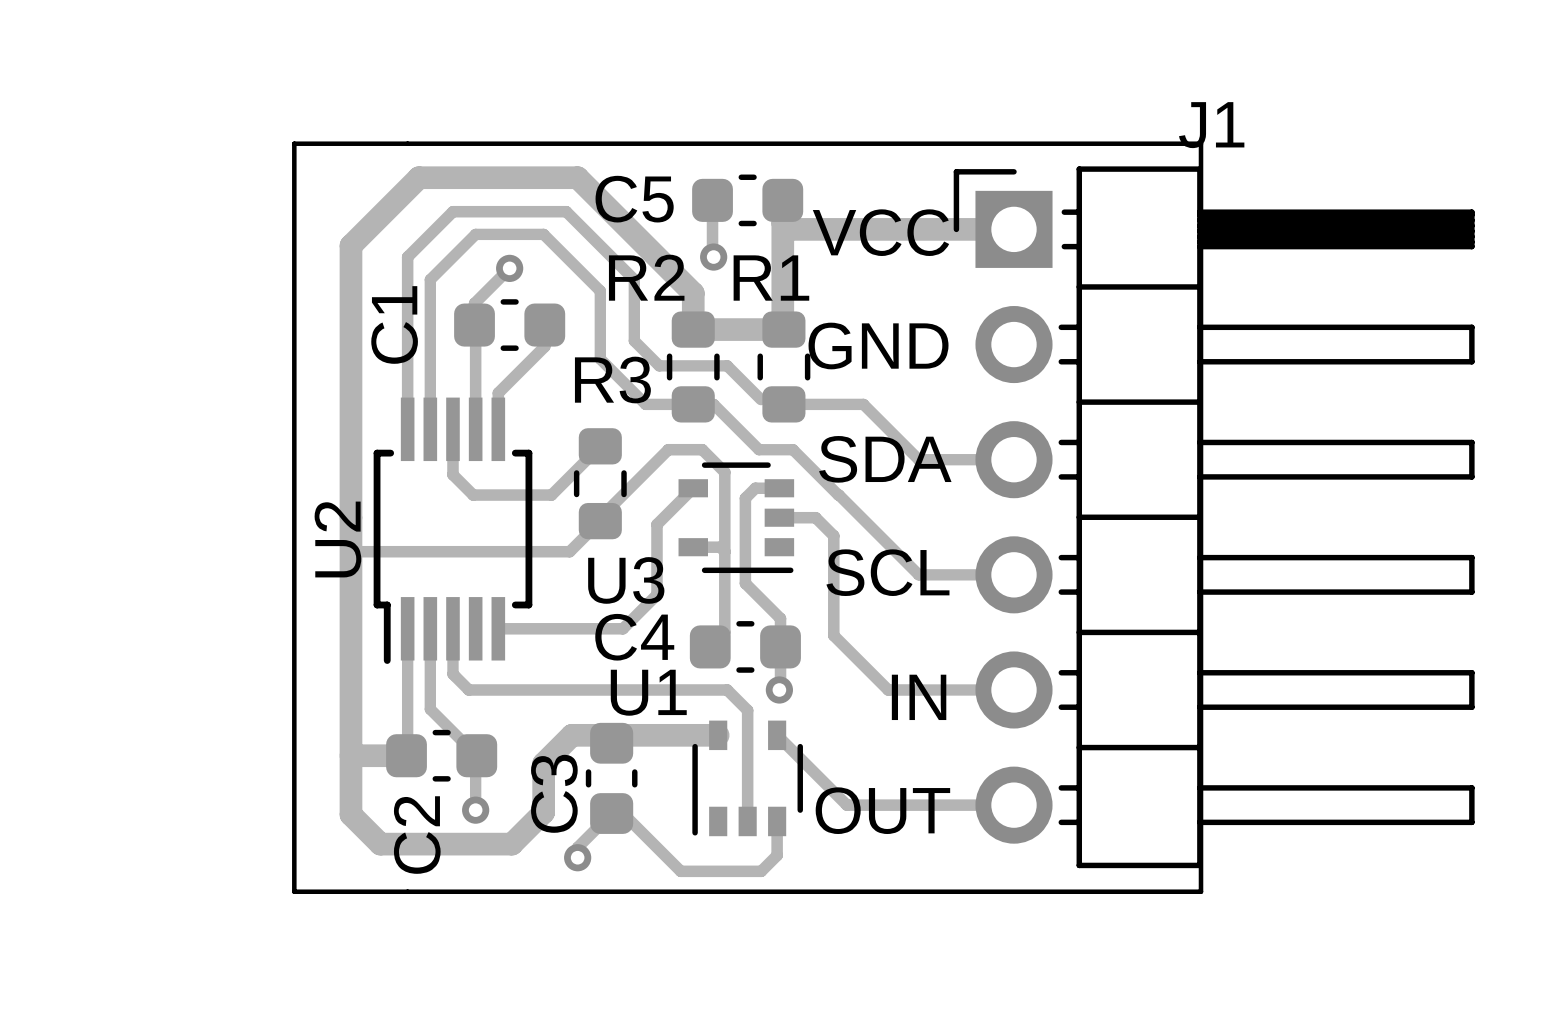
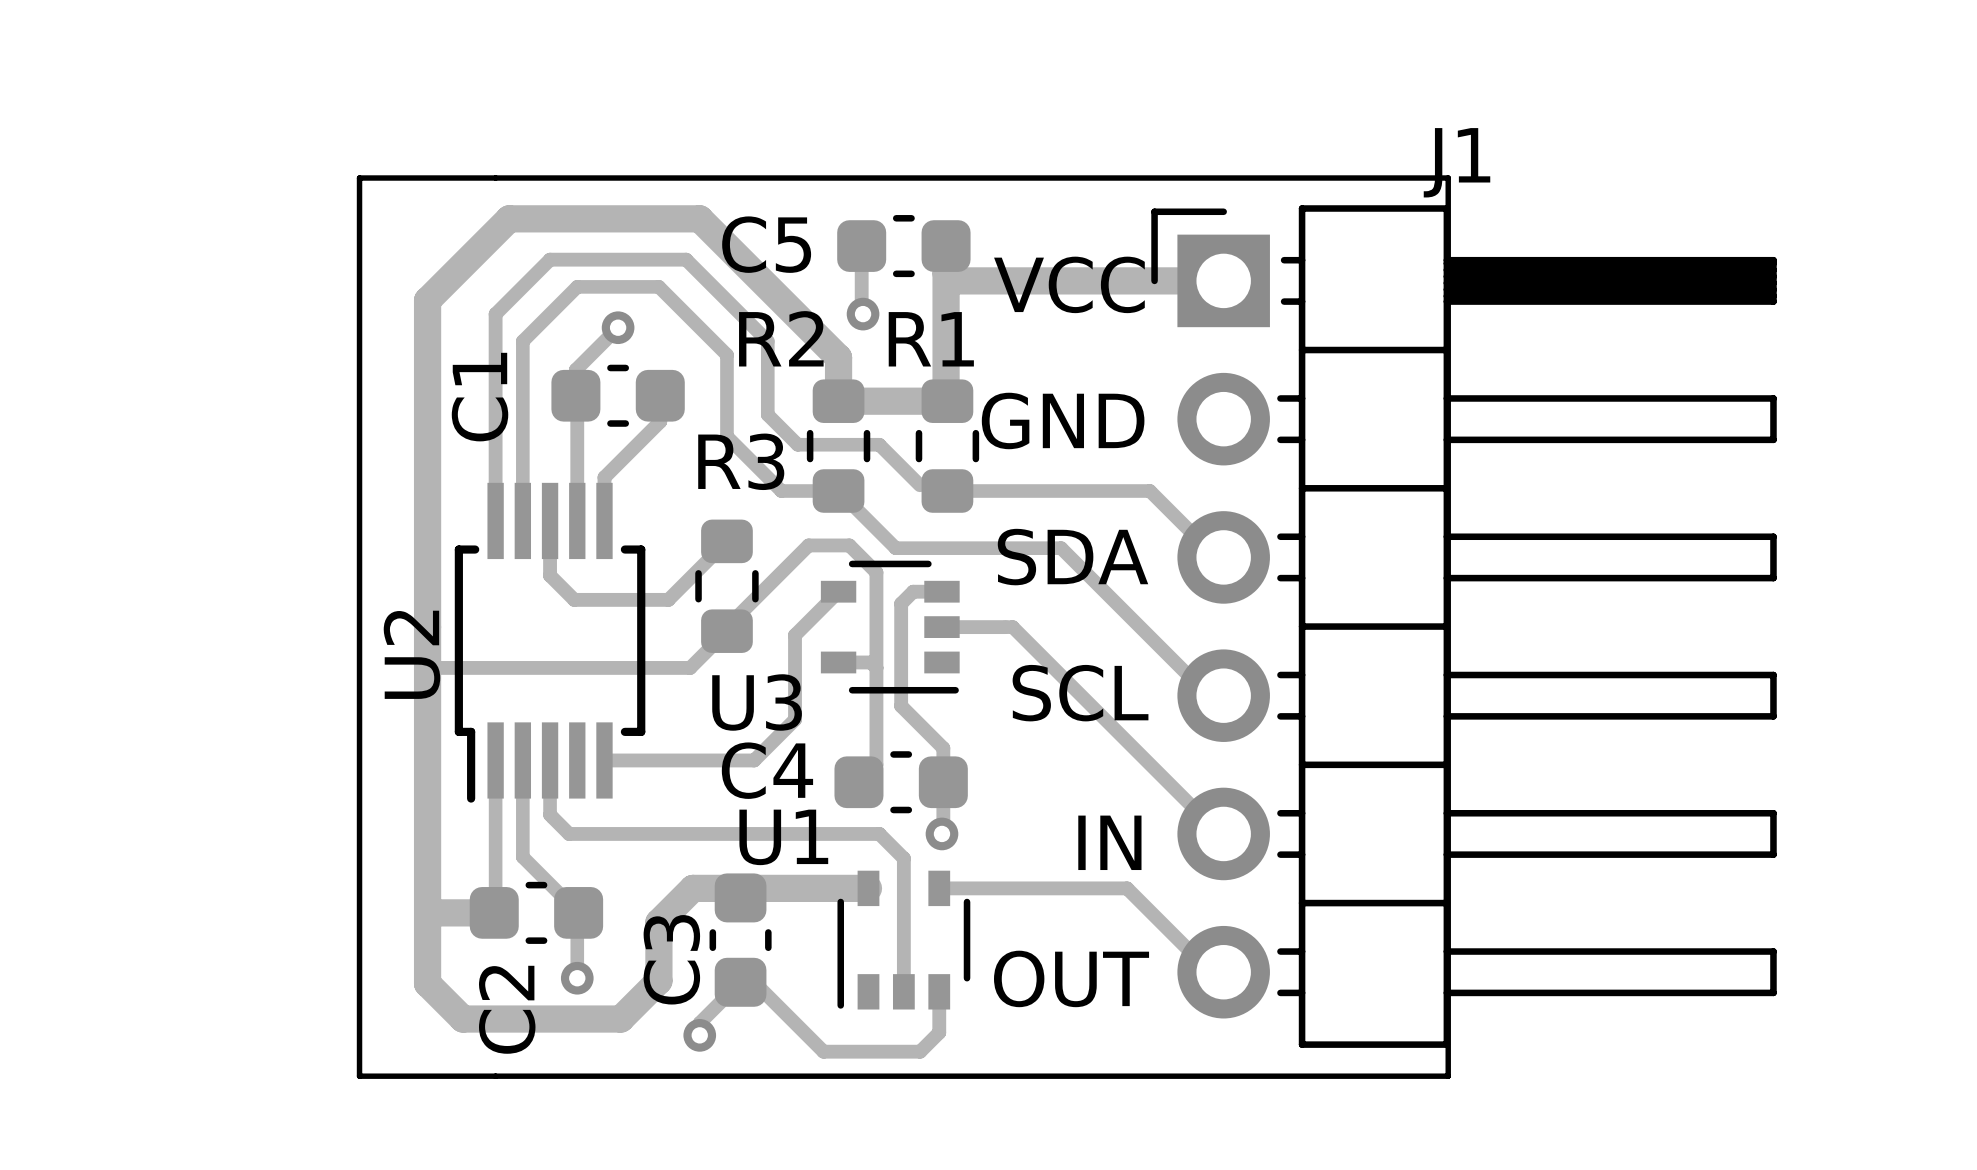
track: (700, 404) (713, 404) (758, 449) (792, 449) (838, 495) -> none
track: (863, 404) (918, 459) (1007, 459) -> (1042, 491) (1149, 491) (1216, 557)
track: (839, 495) (918, 574) (1001, 574) -> (838, 491) (895, 548) (1061, 548) (1208, 695)
track: (815, 517) (833, 535) (833, 635) (888, 689) (1010, 689) -> (985, 627) (1012, 627) (1219, 833)
track: (777, 735) (846, 805) (1003, 805) -> (939, 888) (1127, 888) (1210, 972)

